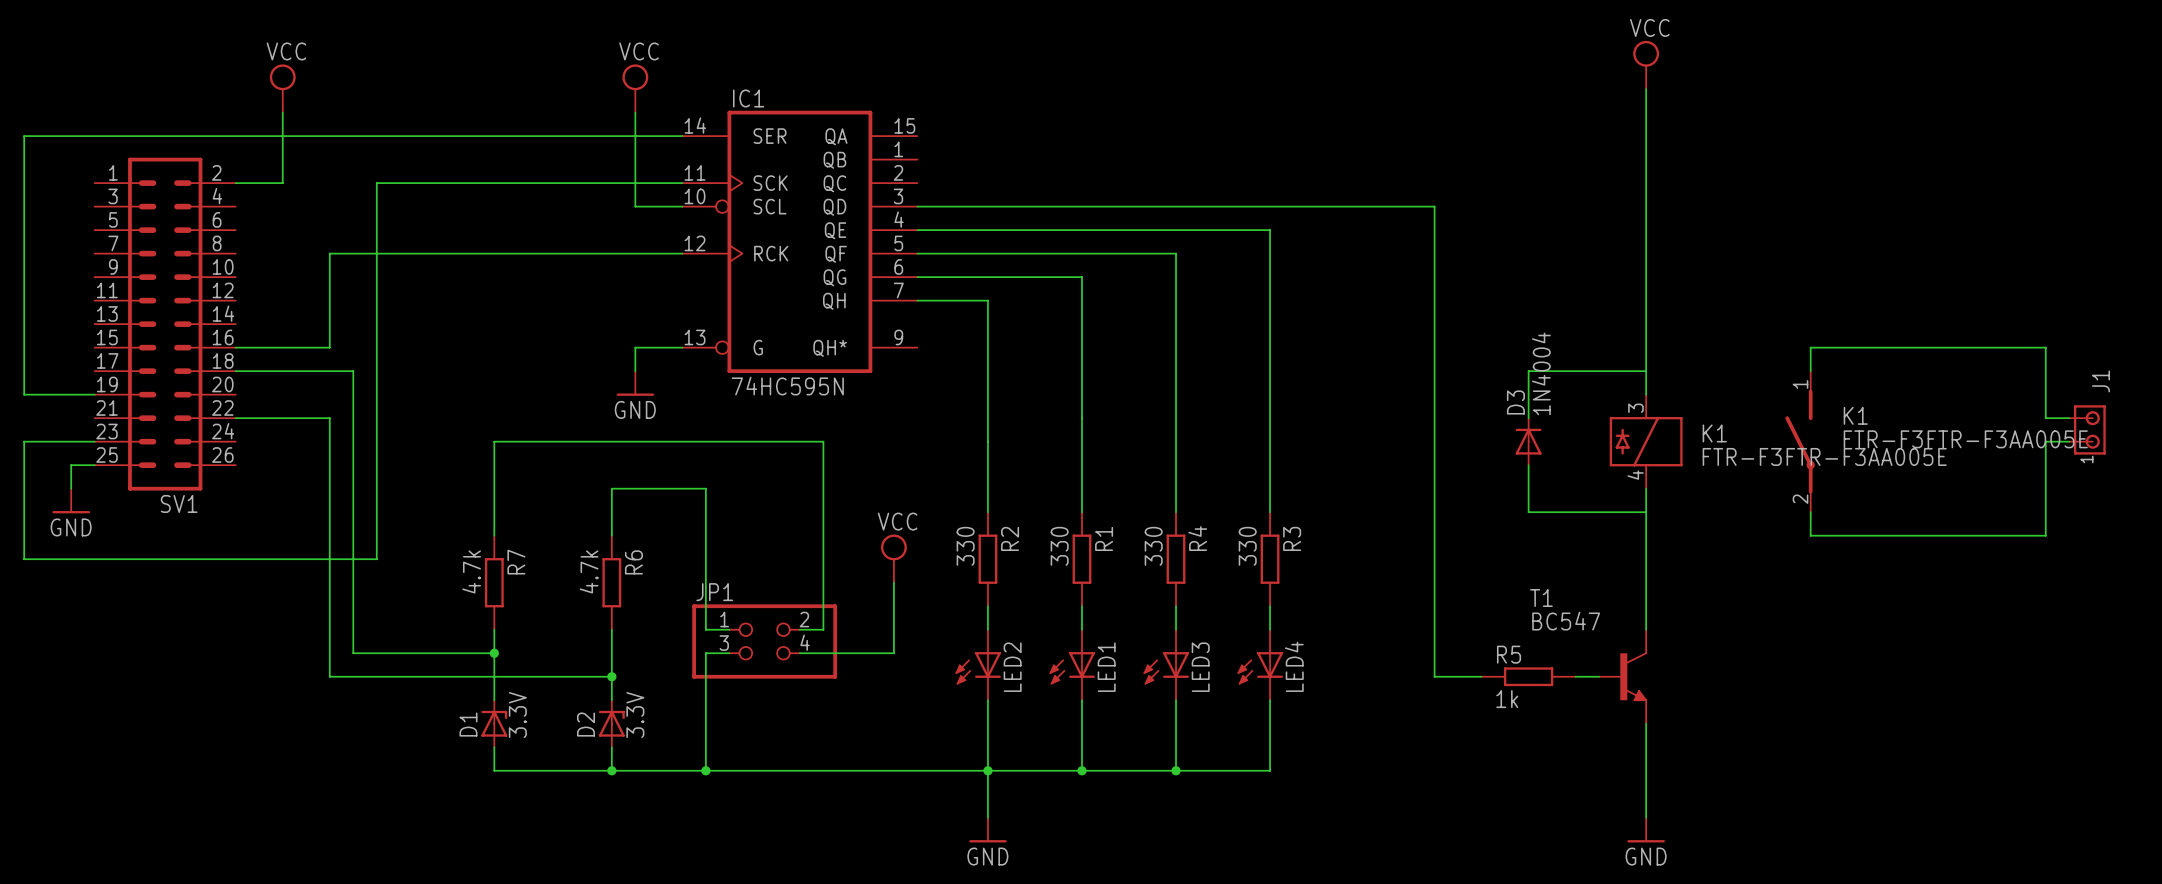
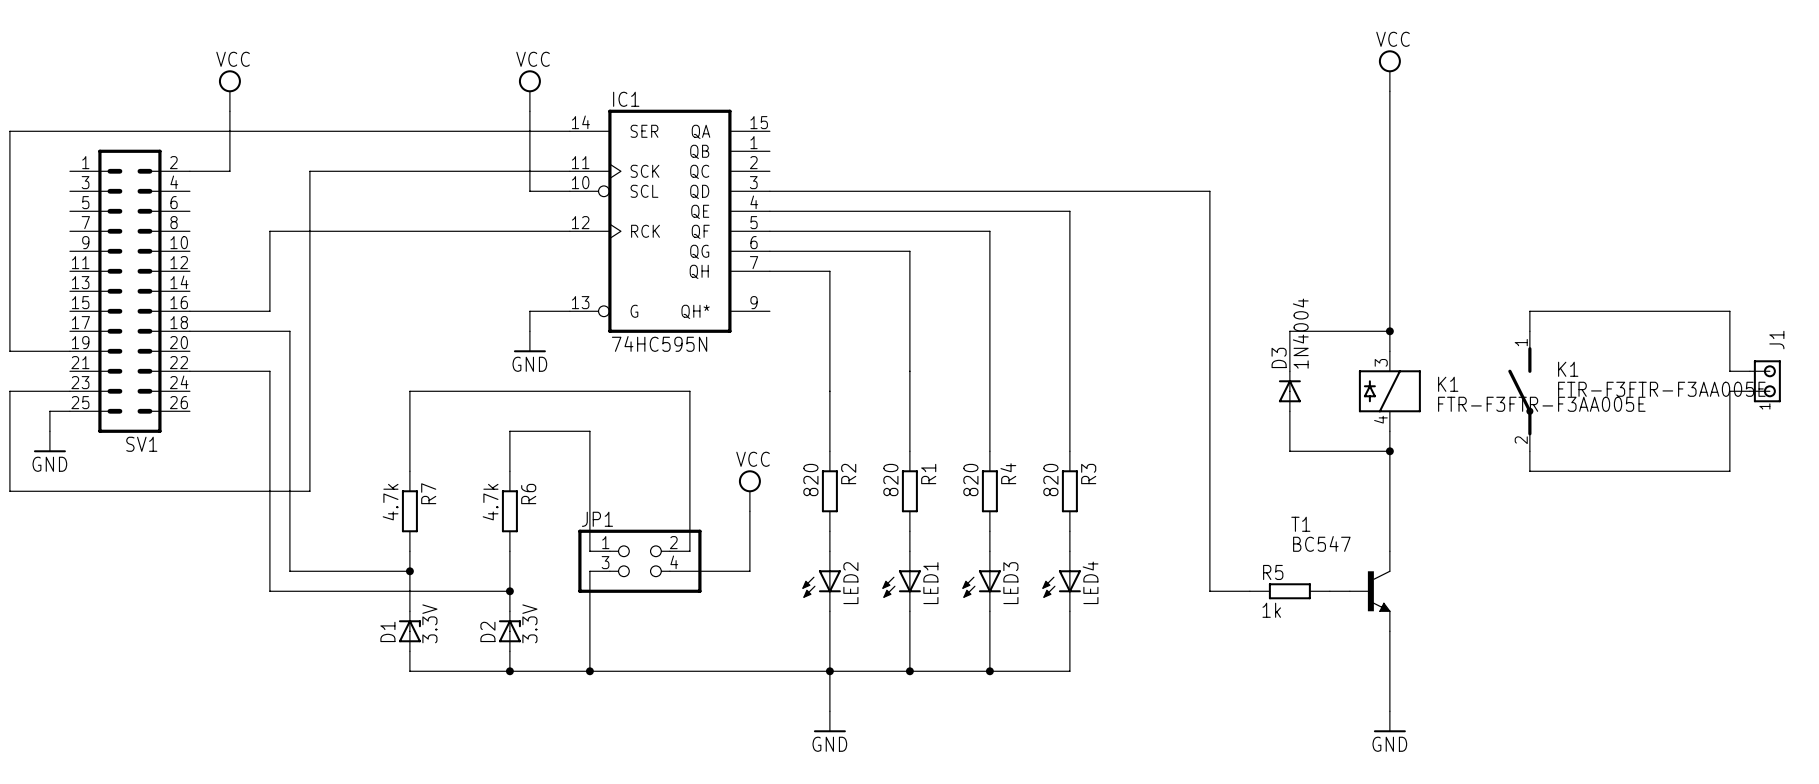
junction: none -> (1389, 331)
junction: none -> (1389, 451)
R2 value: 330 (965, 546) -> 820 (810, 480)
R1 value: 330 (1059, 546) -> 820 (890, 480)
R4 value: 330 (1153, 546) -> 820 (970, 480)
R3 value: 330 (1247, 546) -> 820 (1050, 480)

